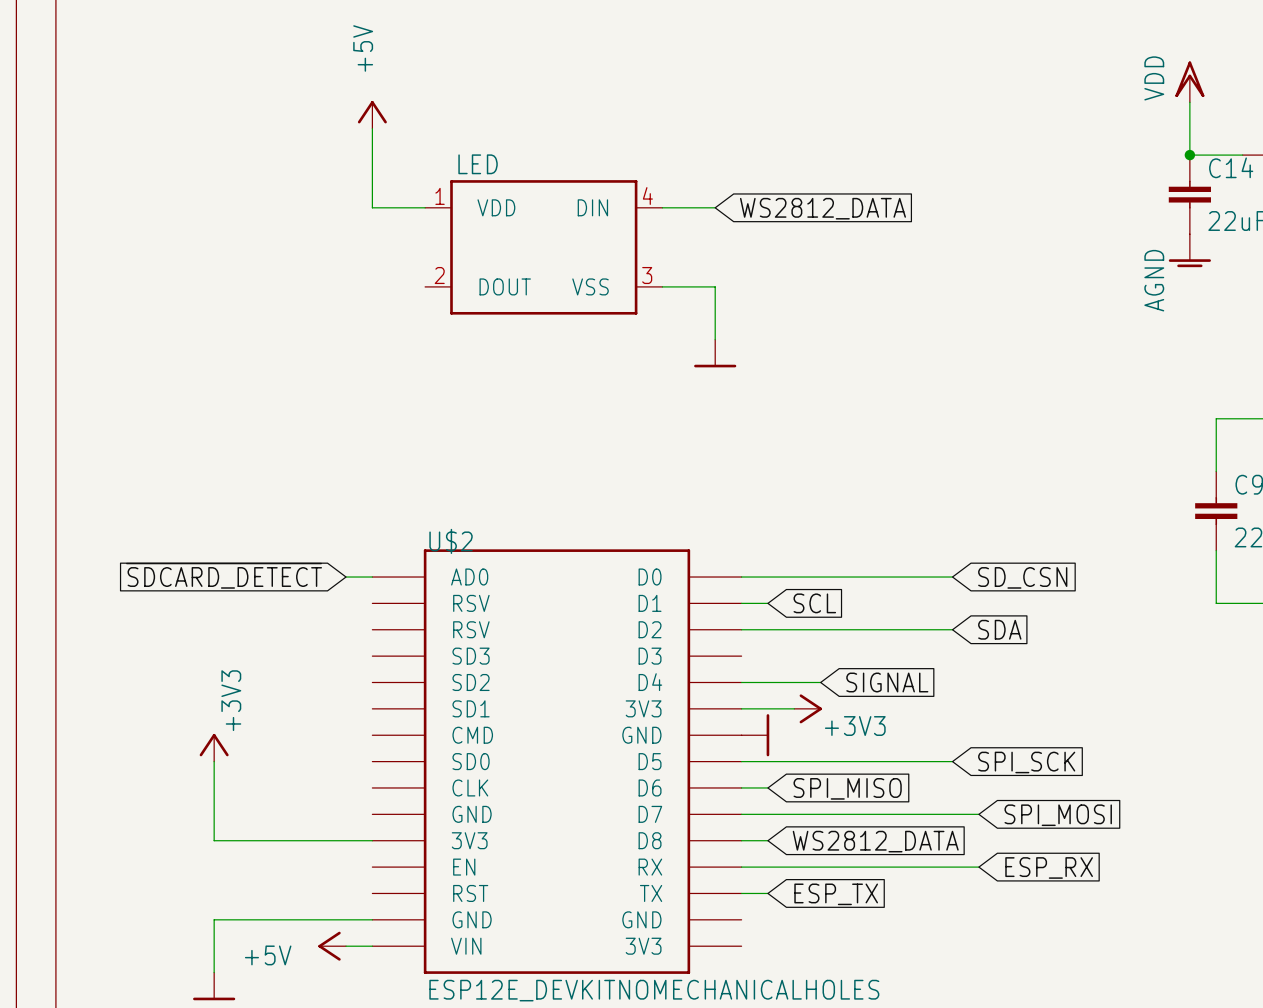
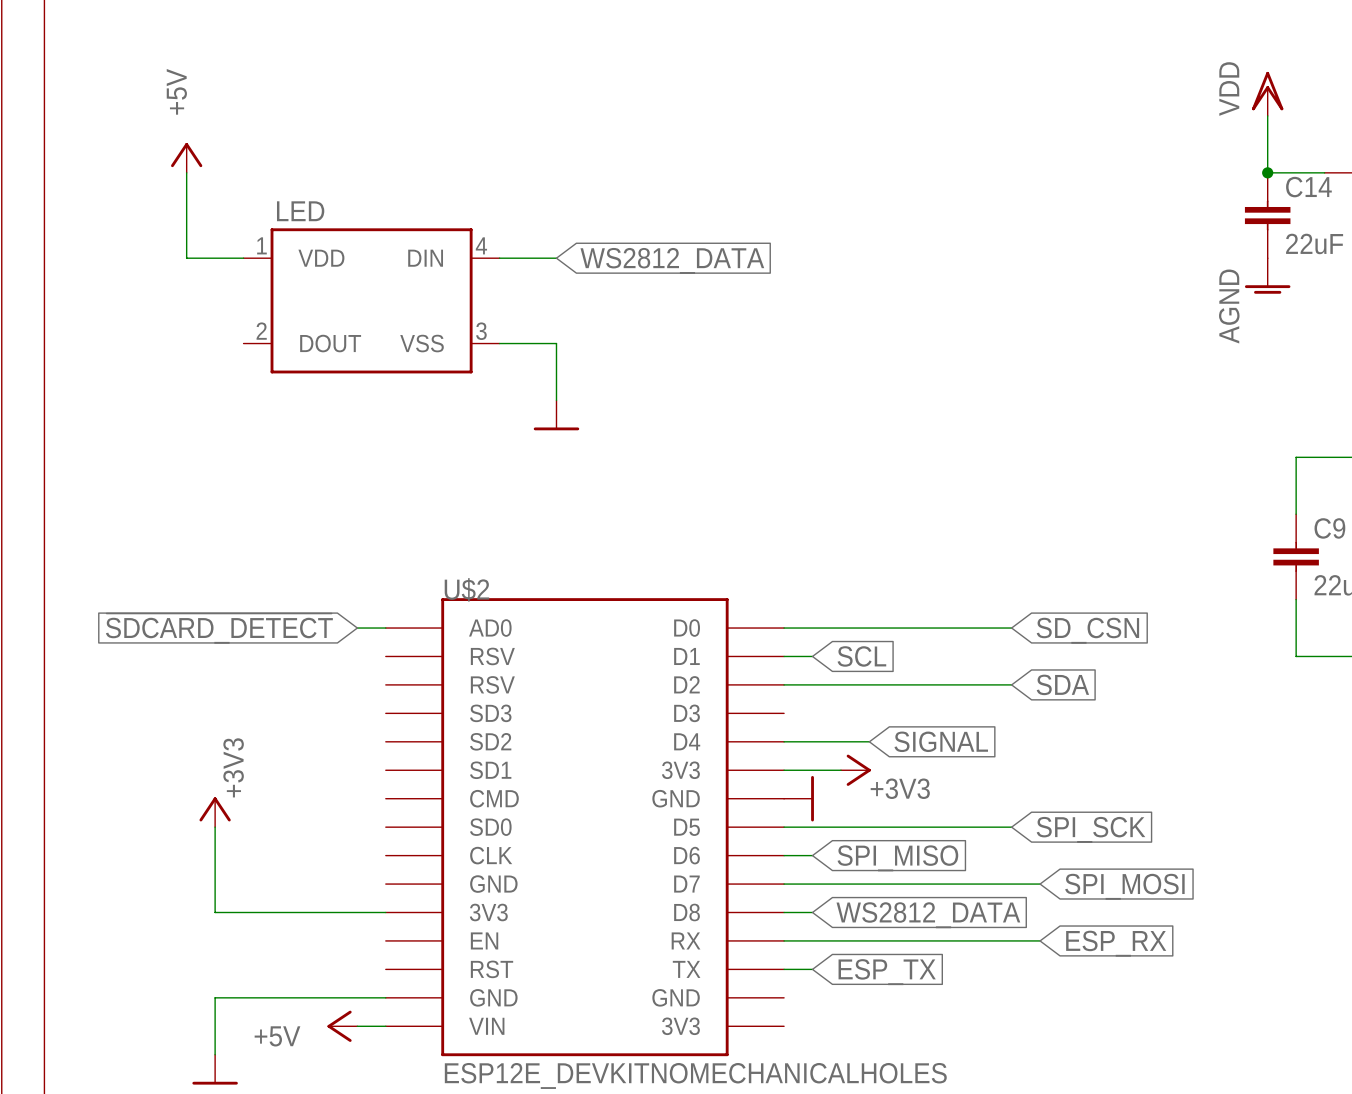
power symbol position: +5V (372, 114) -> +5V (186, 157)
wire: (372, 128) (372, 207) (425, 207) -> (186, 172) (186, 258) (243, 258)
wire: (662, 207) (715, 207) -> (499, 258) (556, 258)
global label position: WS2812_DATA (822, 208) -> WS2812_DATA (672, 260)
LED position: (543, 247) -> (371, 300)
wire: (662, 286) (715, 286) (715, 339) -> (499, 343) (556, 343) (556, 400)
power symbol position: (715, 353) -> (556, 415)

